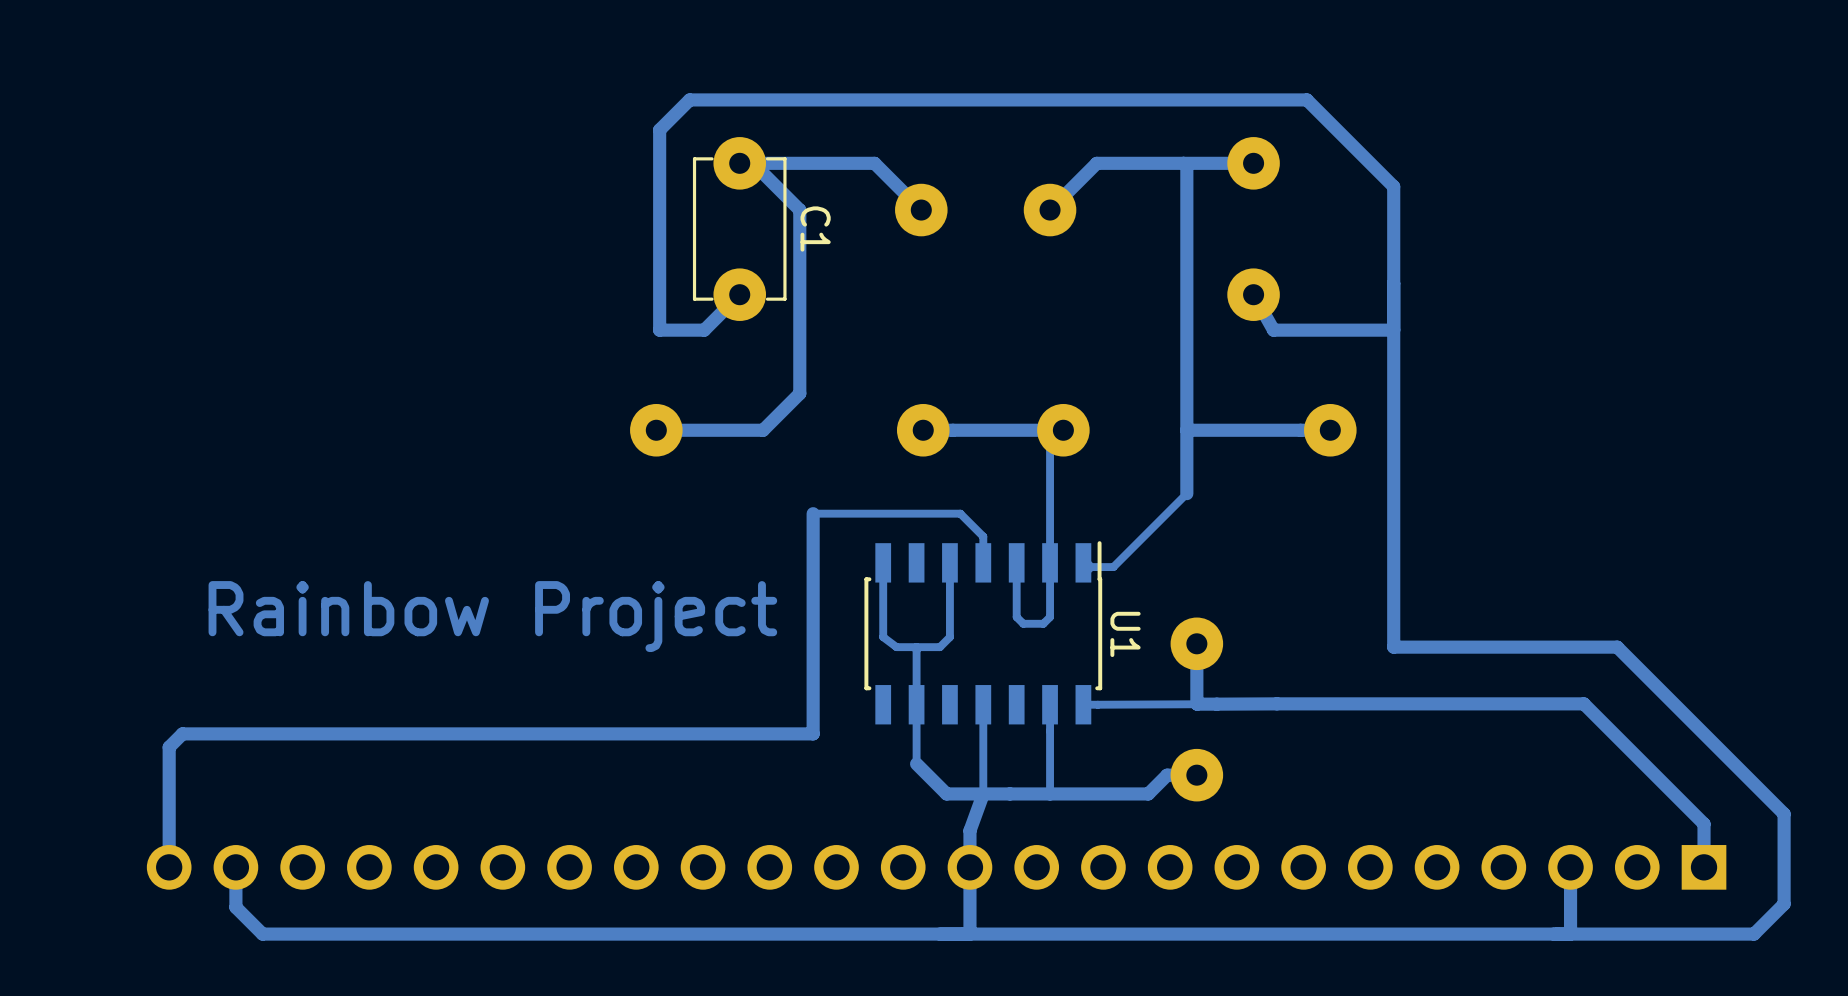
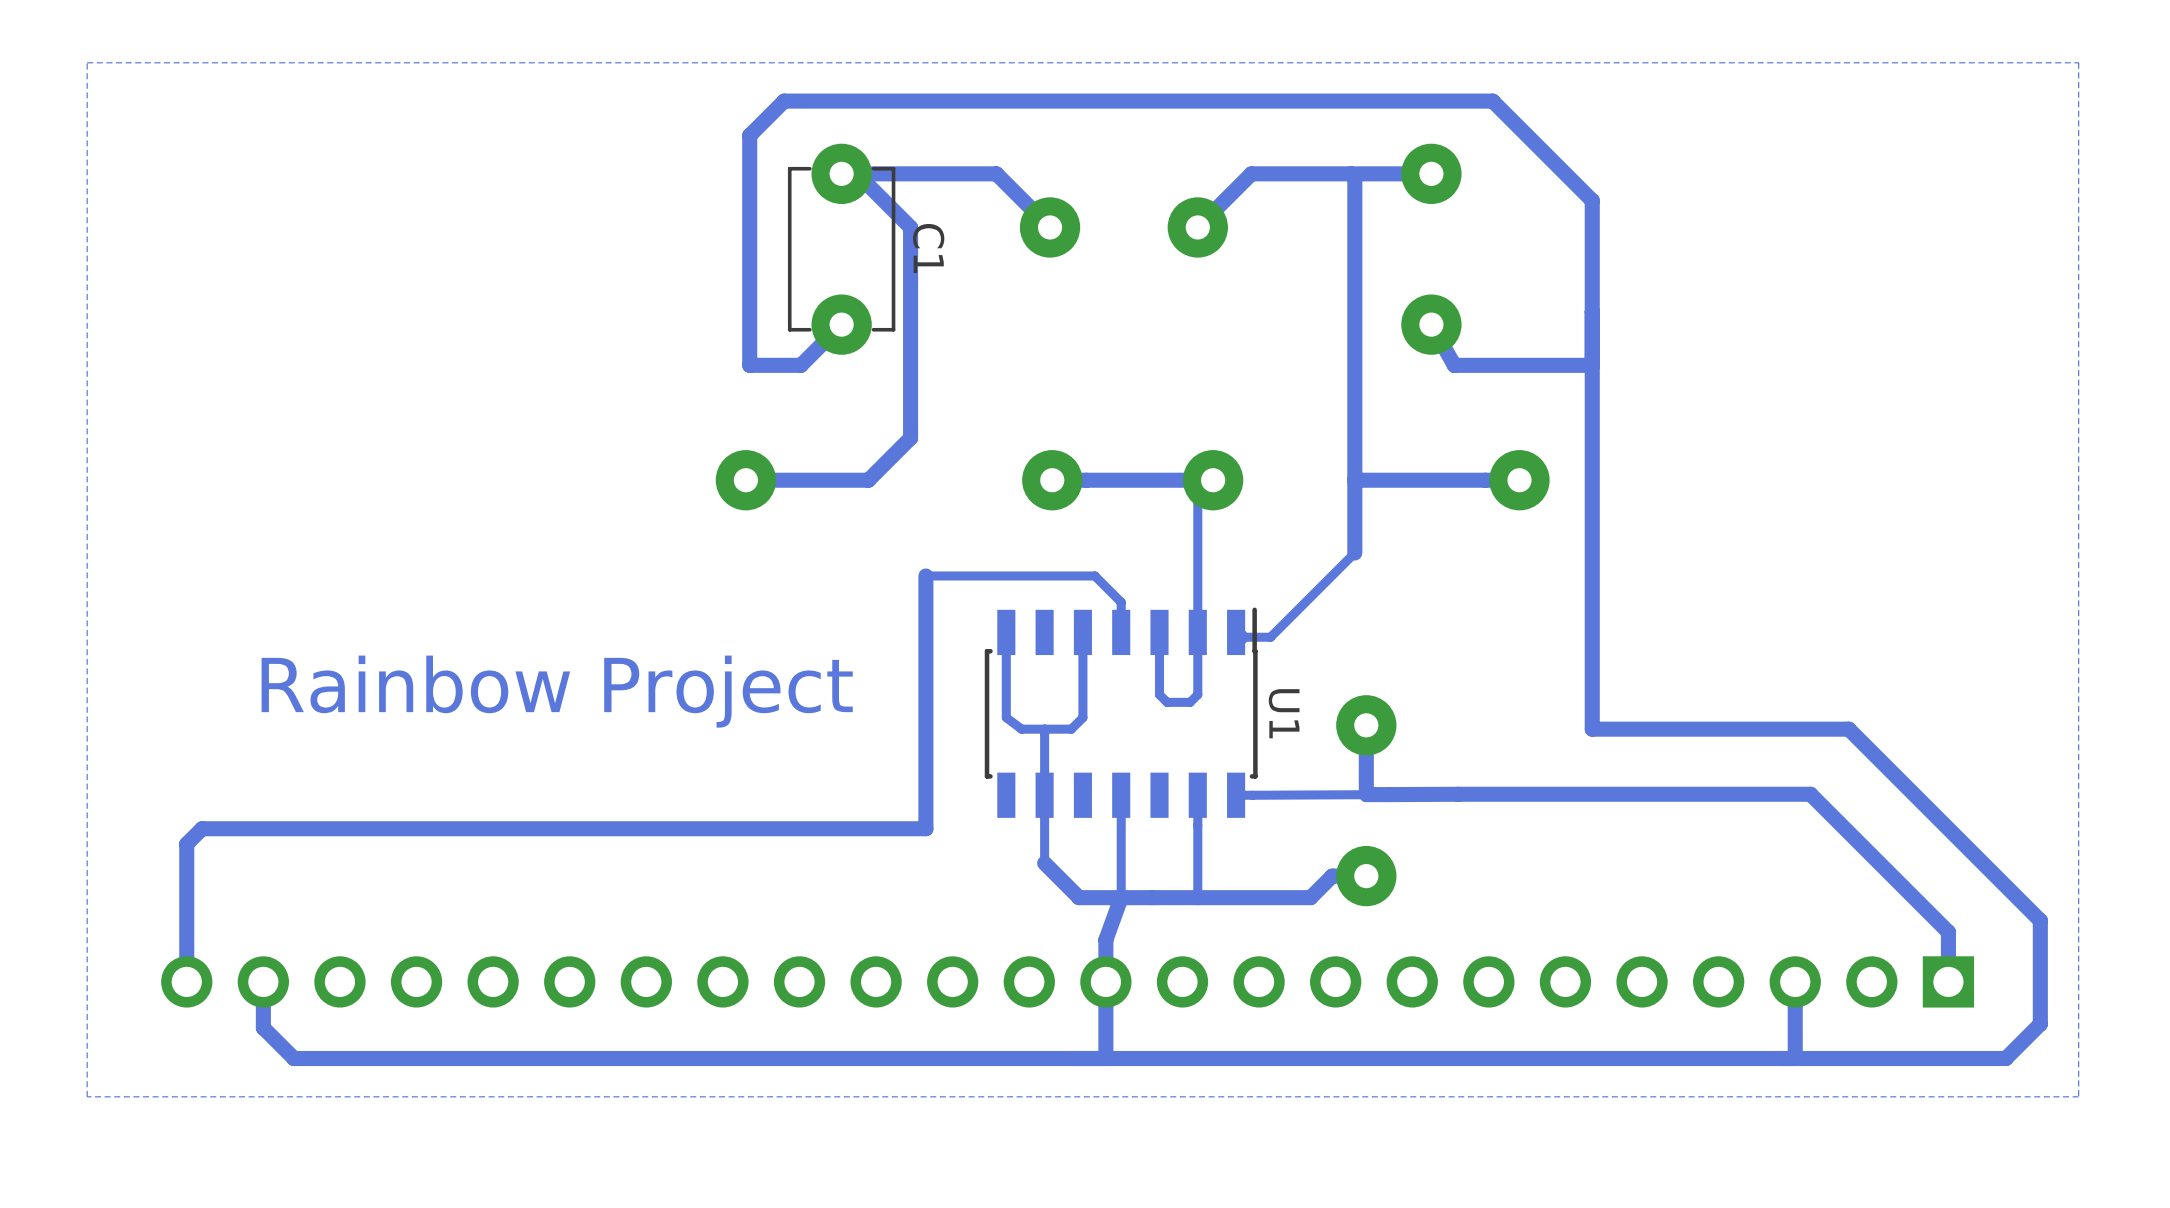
bottom zone outline: none -> (2078, 62) (2078, 1096) (87, 1096) (87, 62) (2078, 62)

